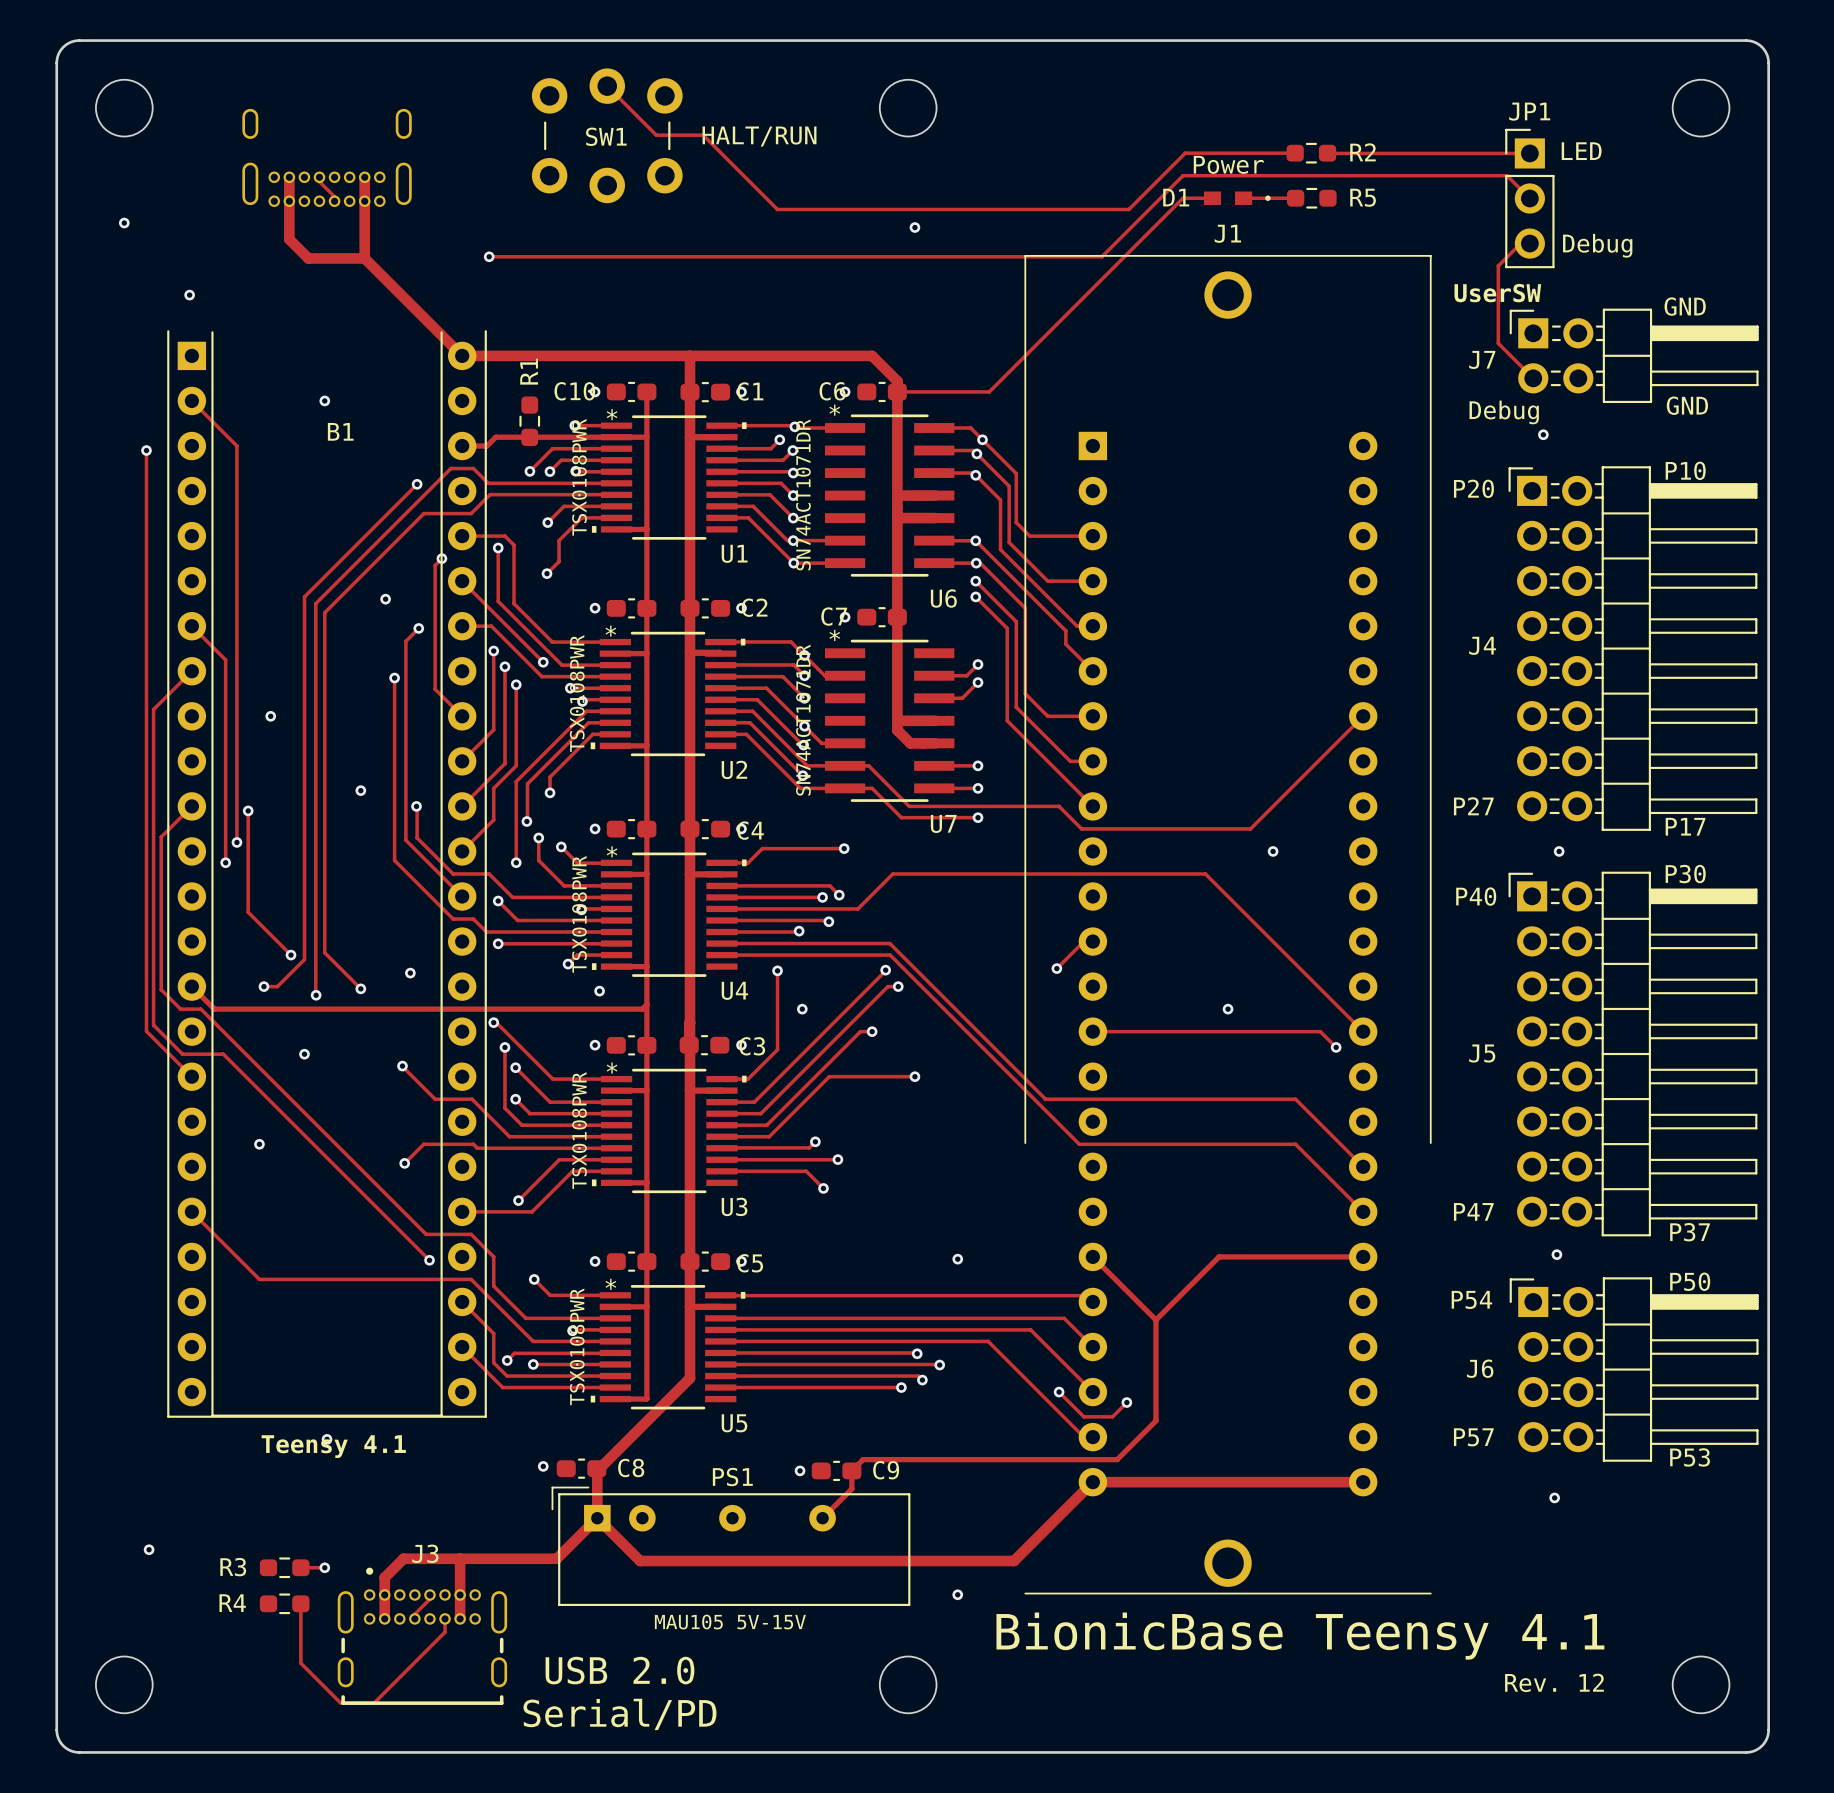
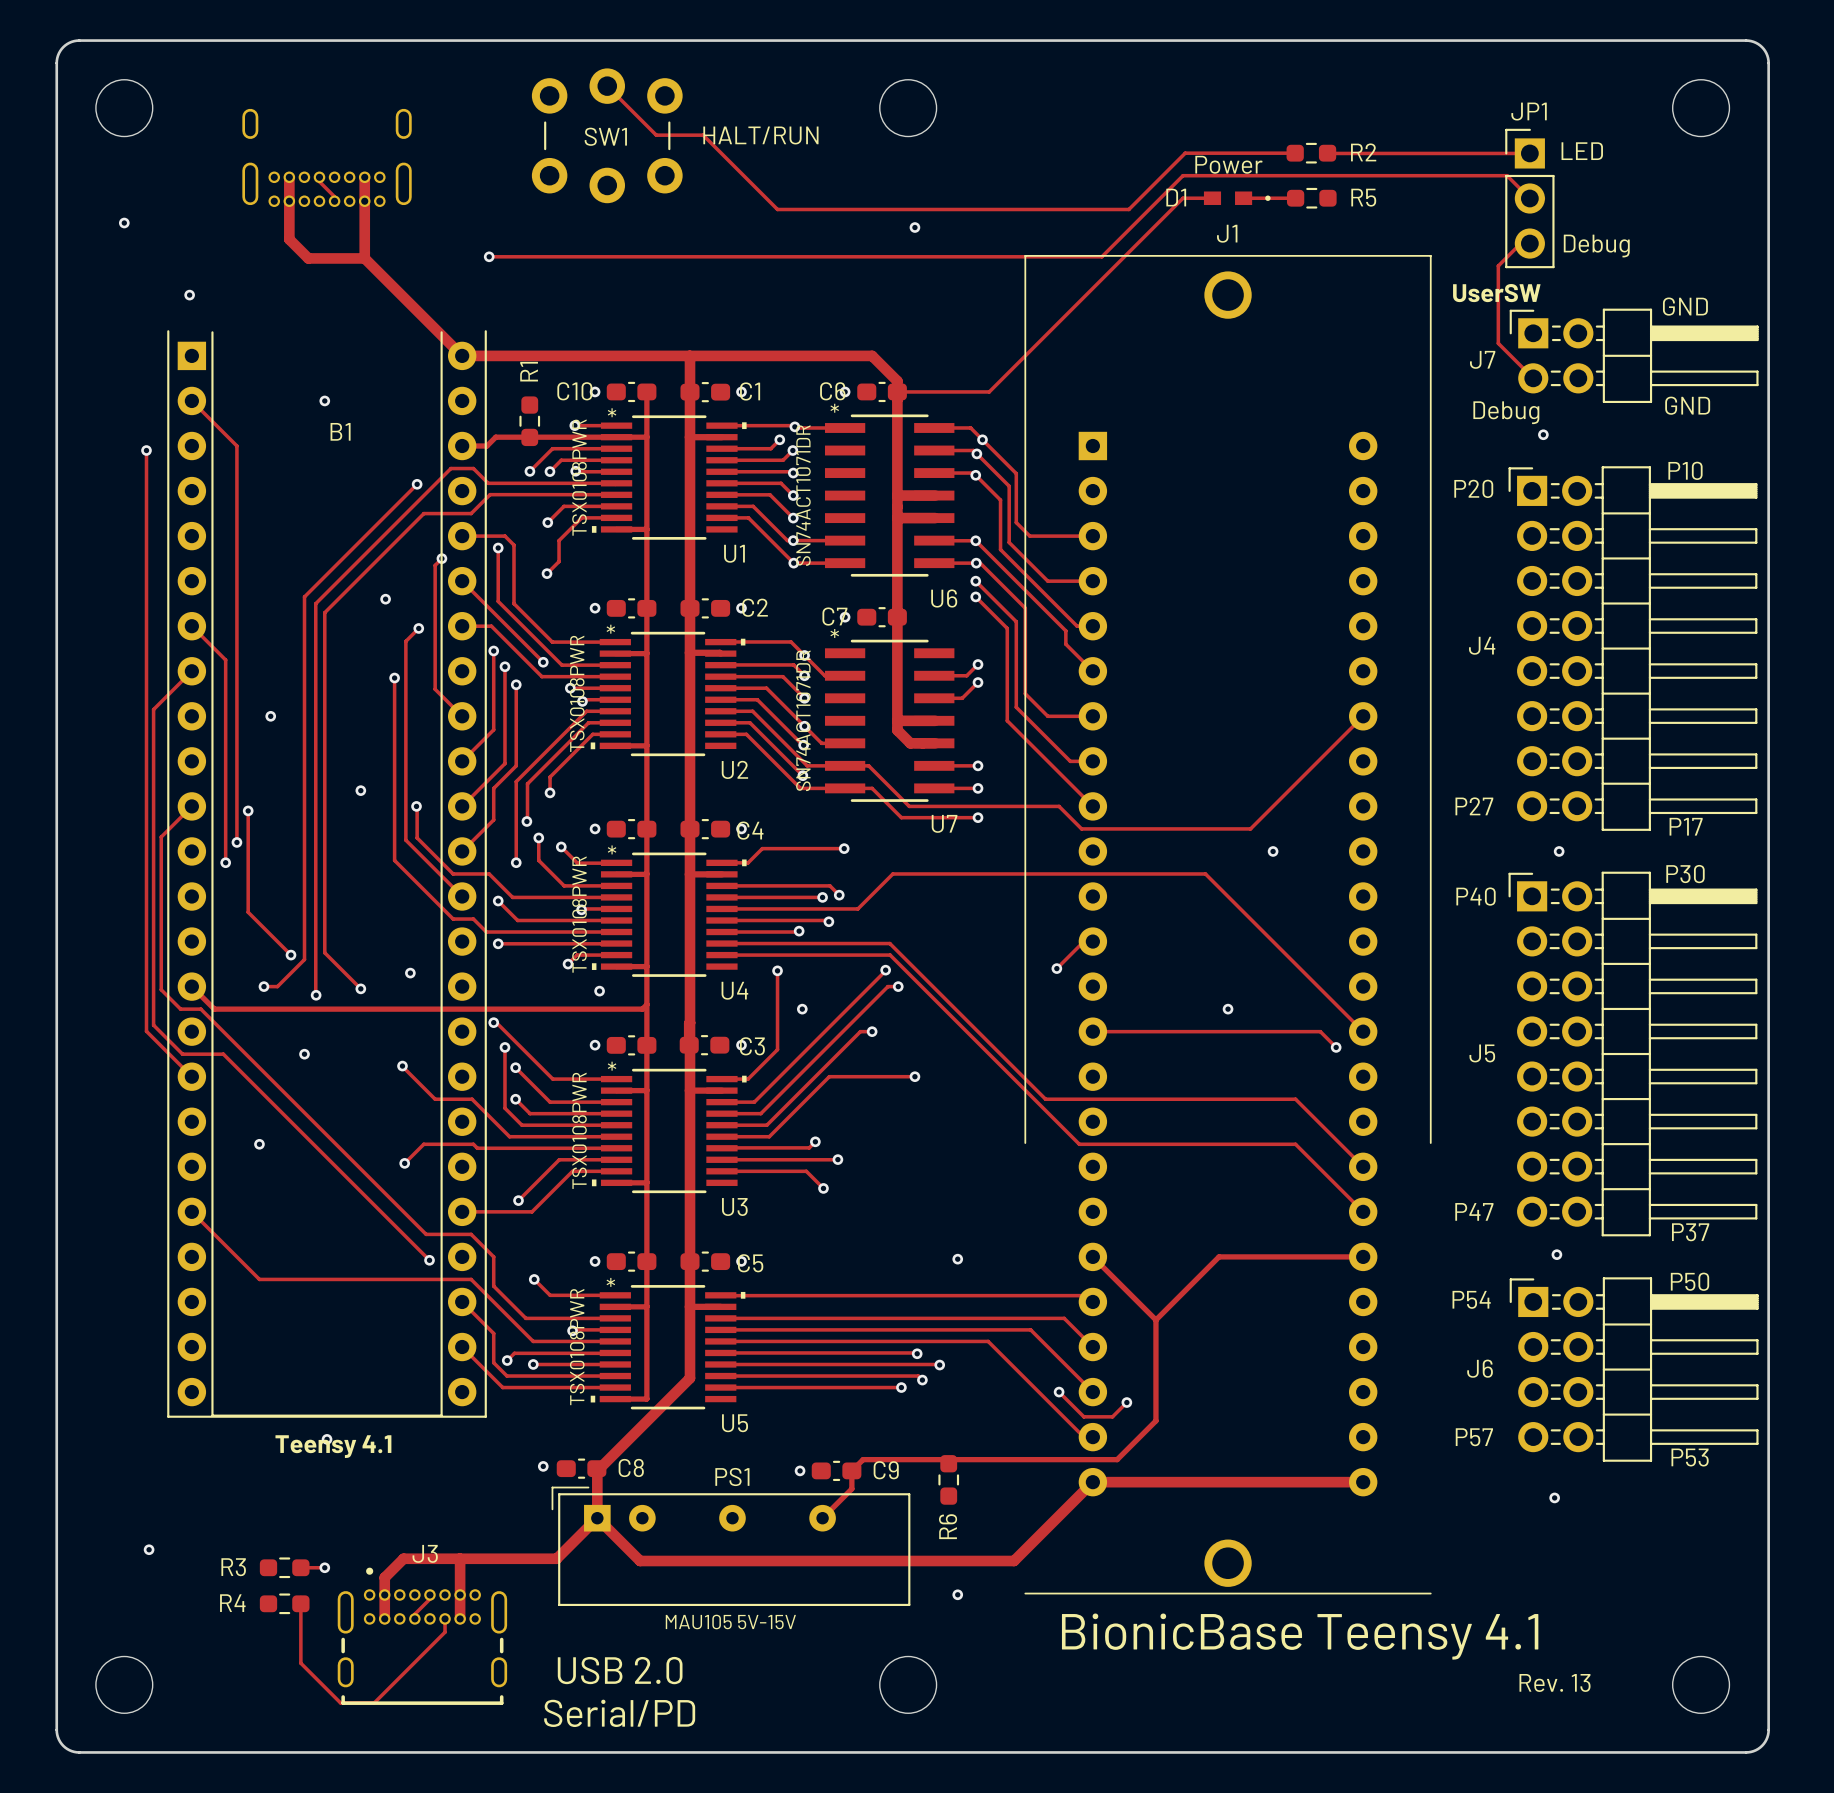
R6: none -> (948, 1479)
text: Rev. 12 (1554, 1682) -> Rev. 13 (1555, 1682)

